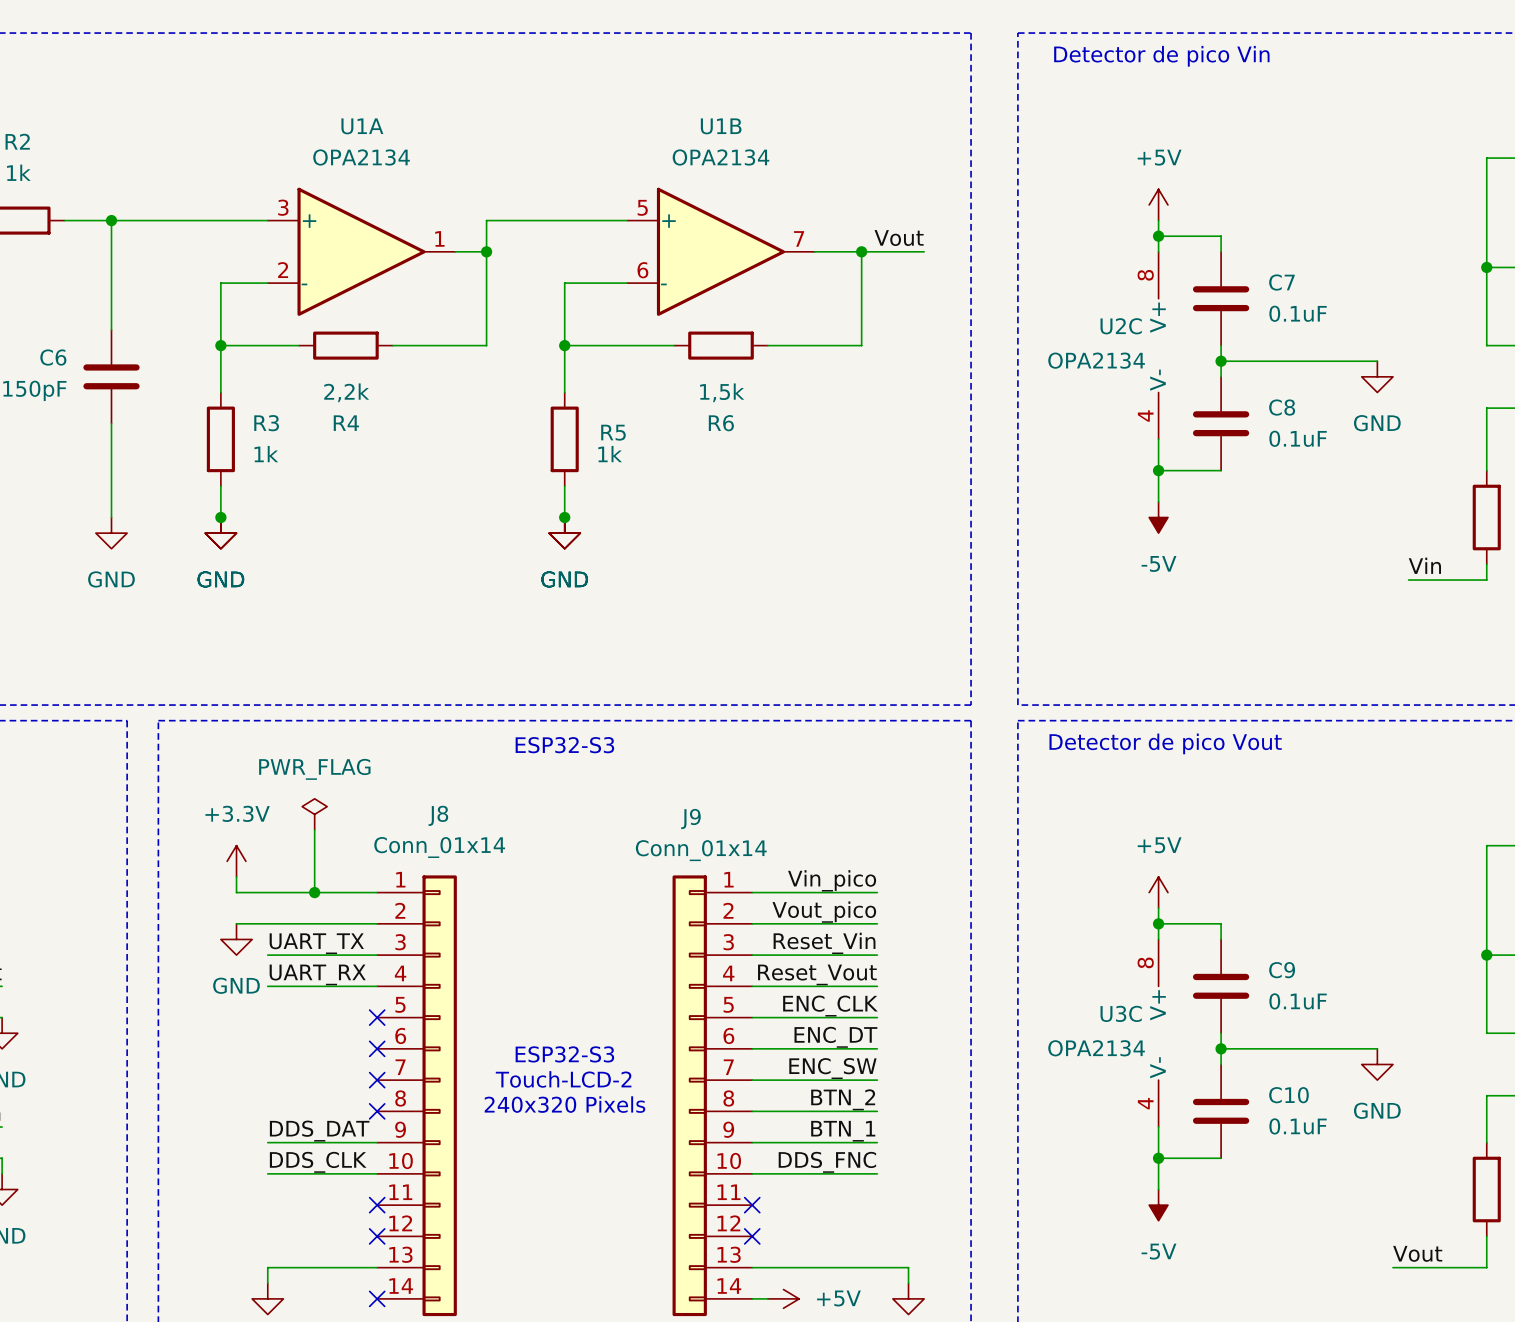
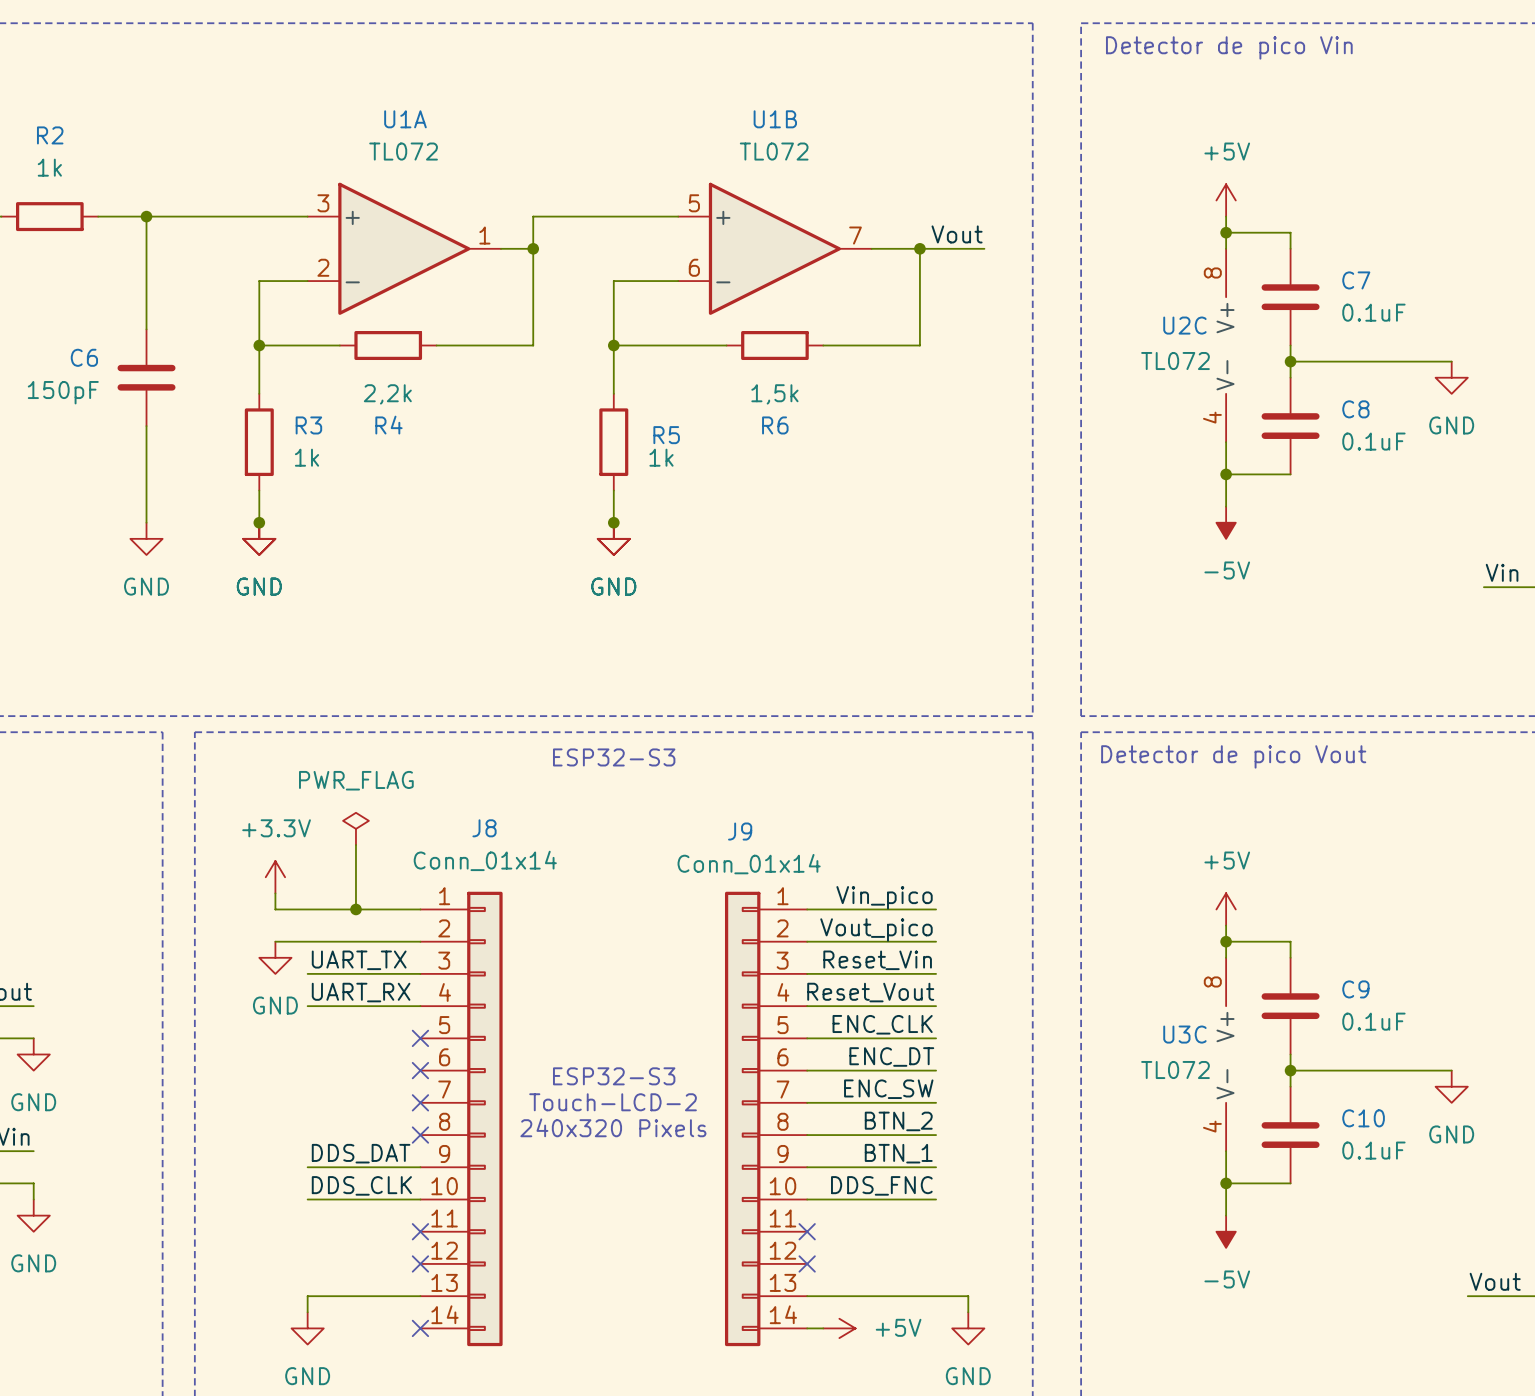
U1A value: OPA2134 (361, 157) -> TL072 (403, 151)
U1B value: OPA2134 (720, 157) -> TL072 (774, 151)
U2C value: OPA2134 (1096, 360) -> TL072 (1175, 361)
U3C value: OPA2134 (1096, 1048) -> TL072 (1175, 1070)

